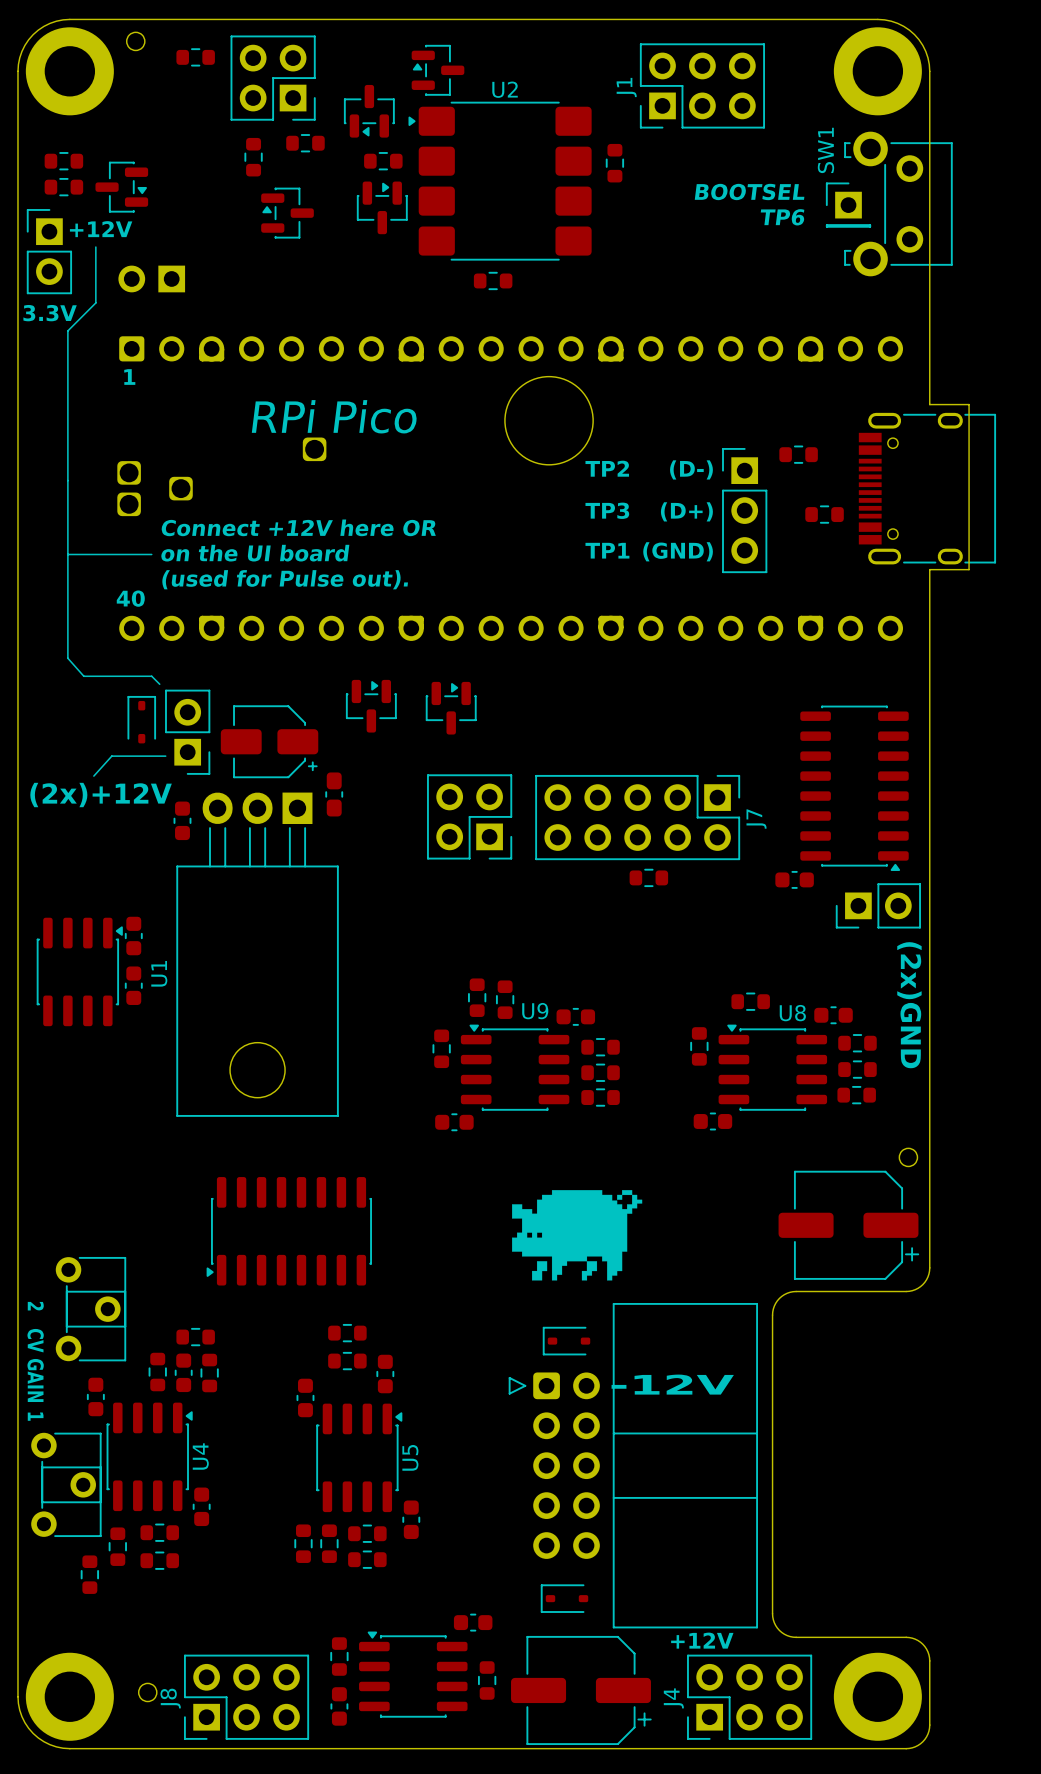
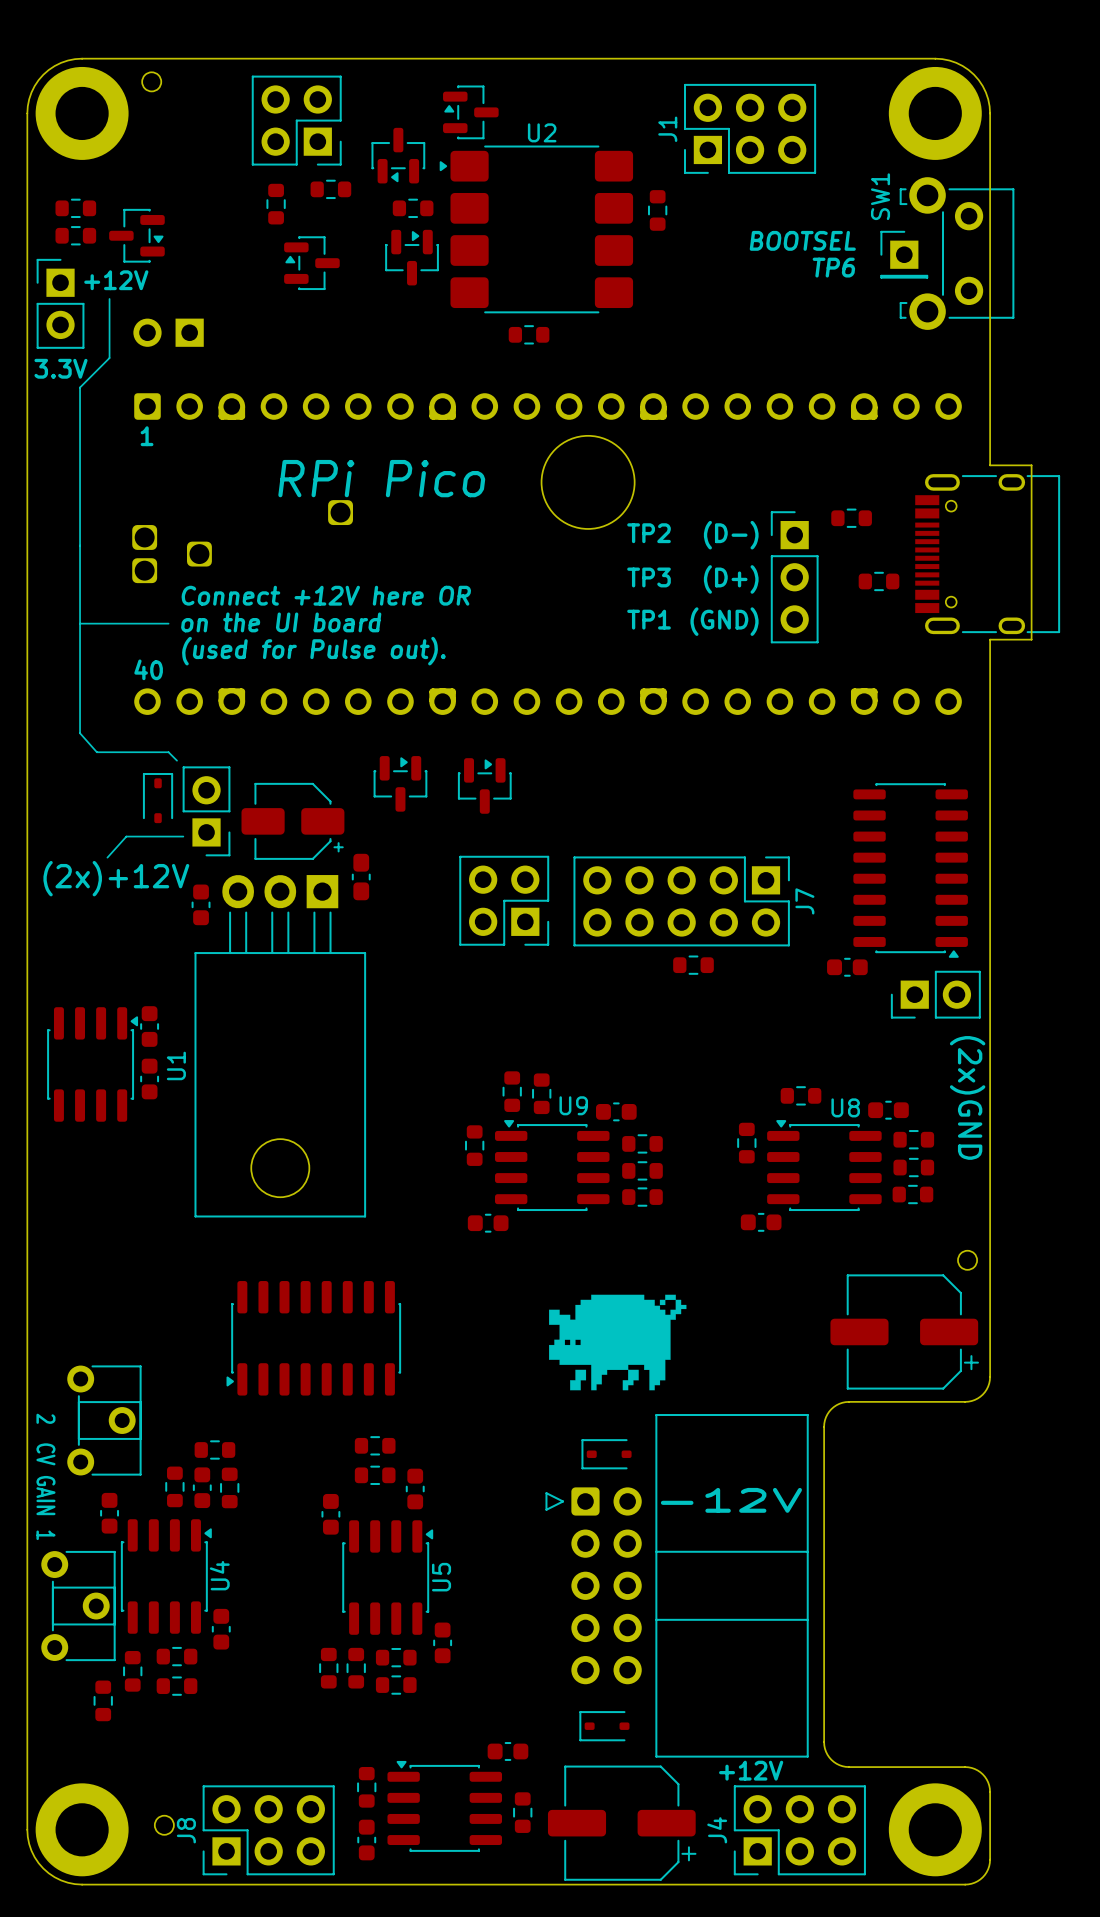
part: (195, 57) -> none

